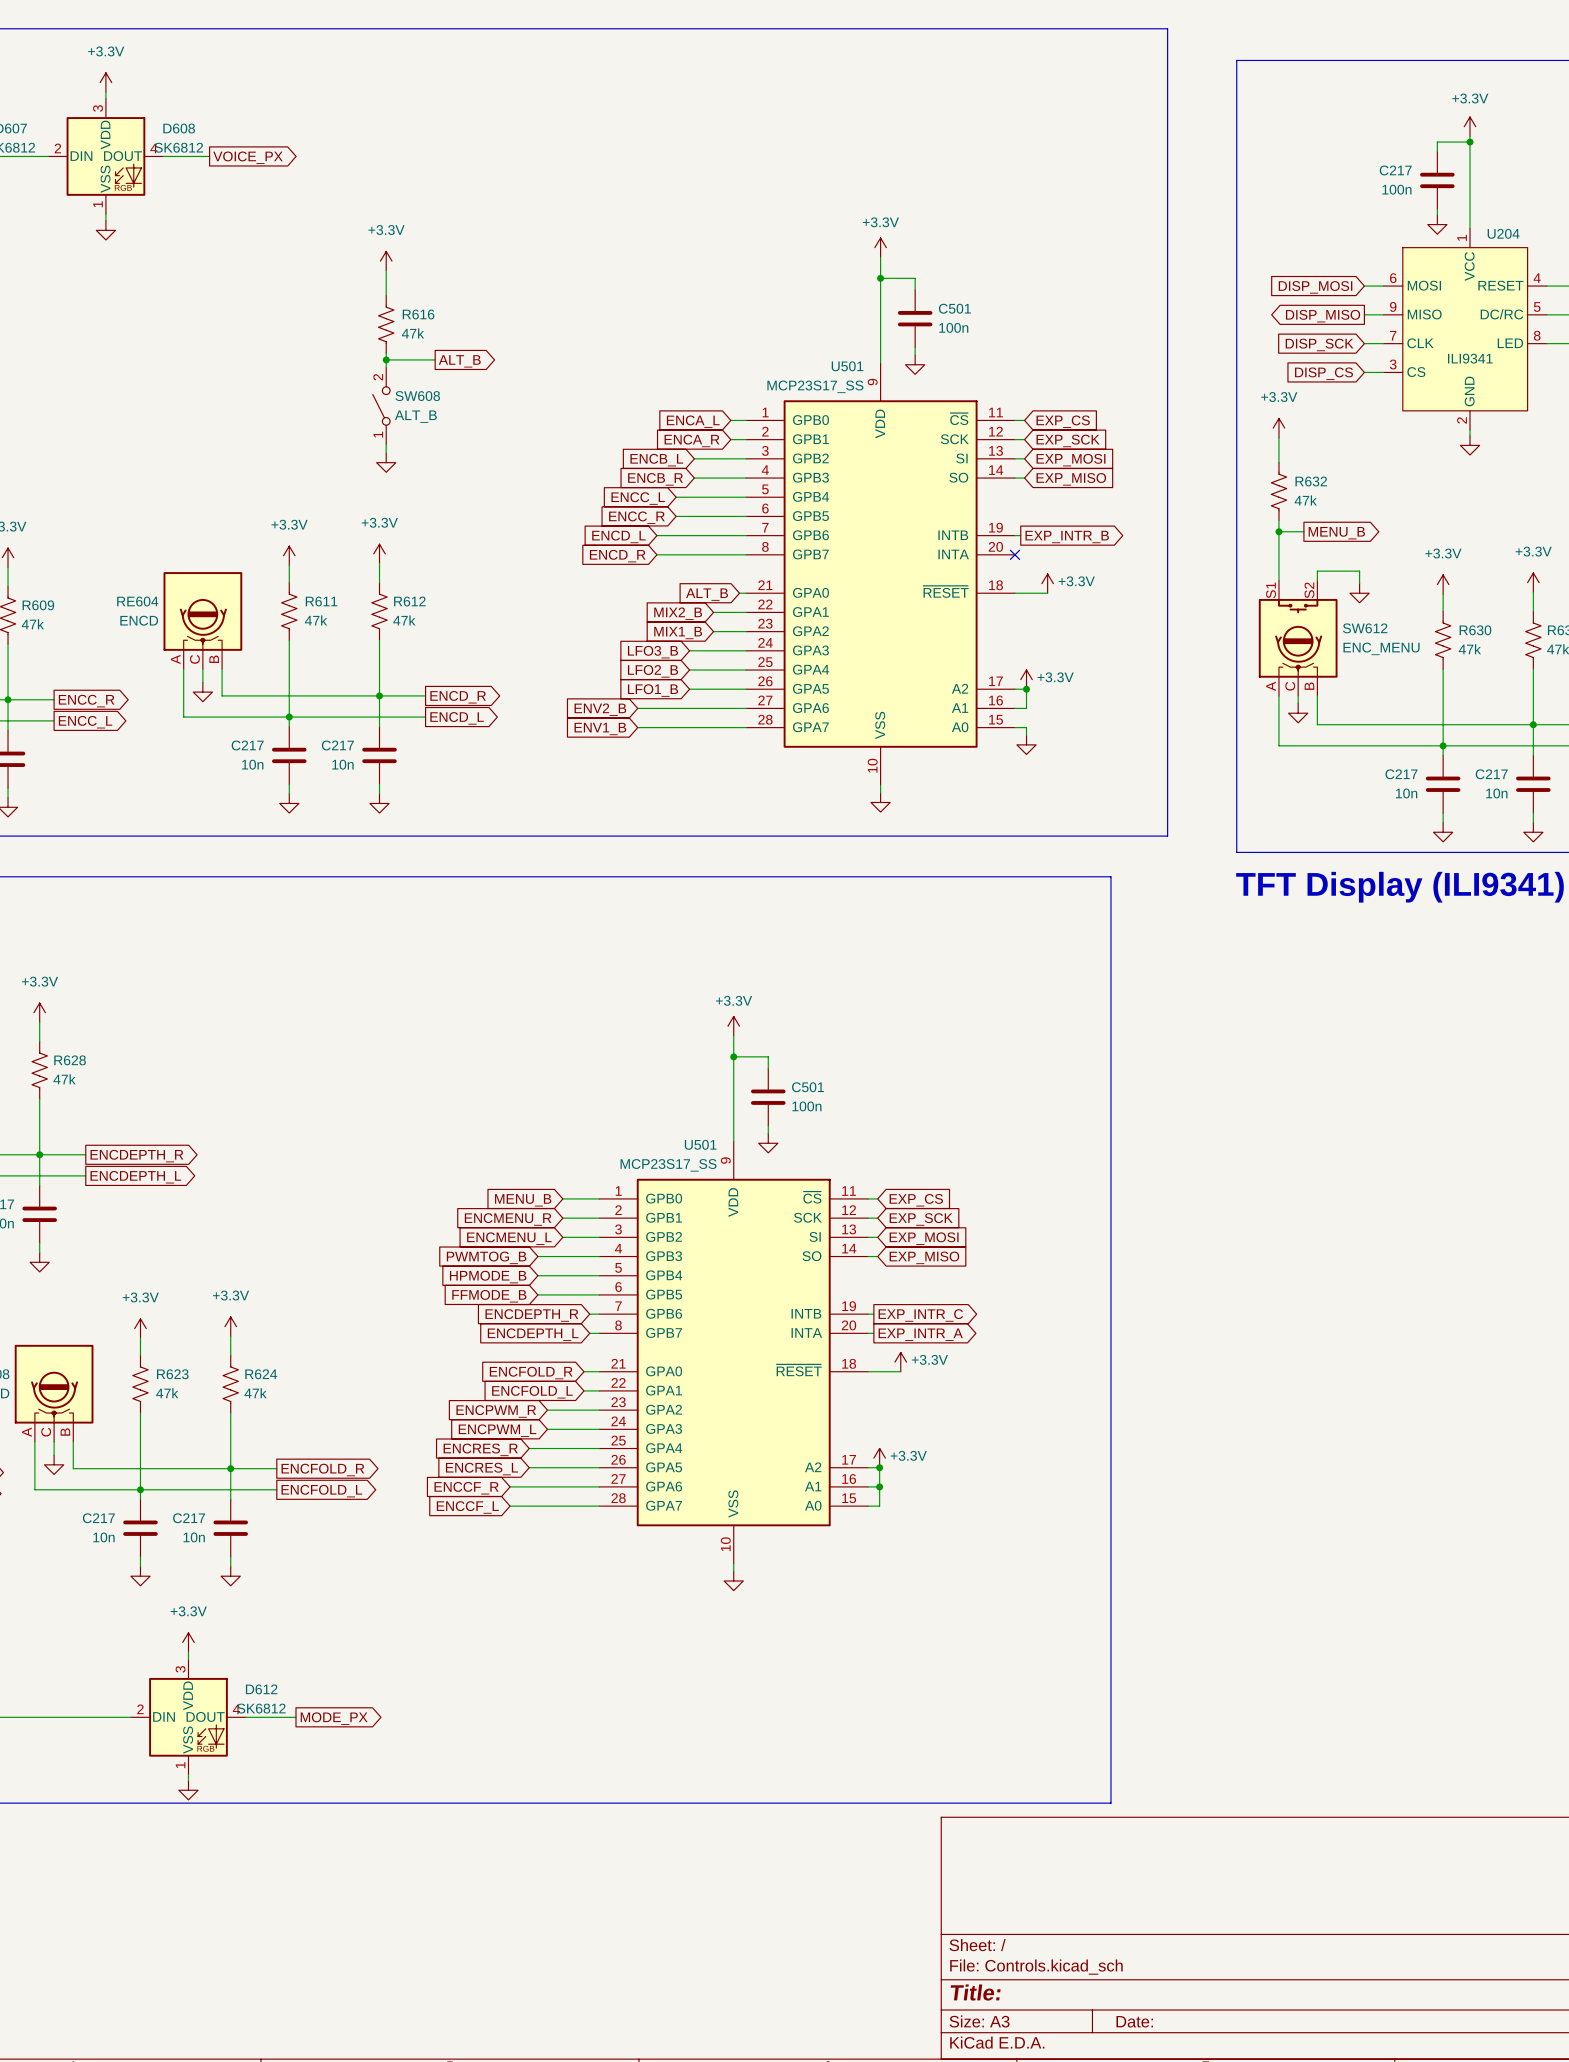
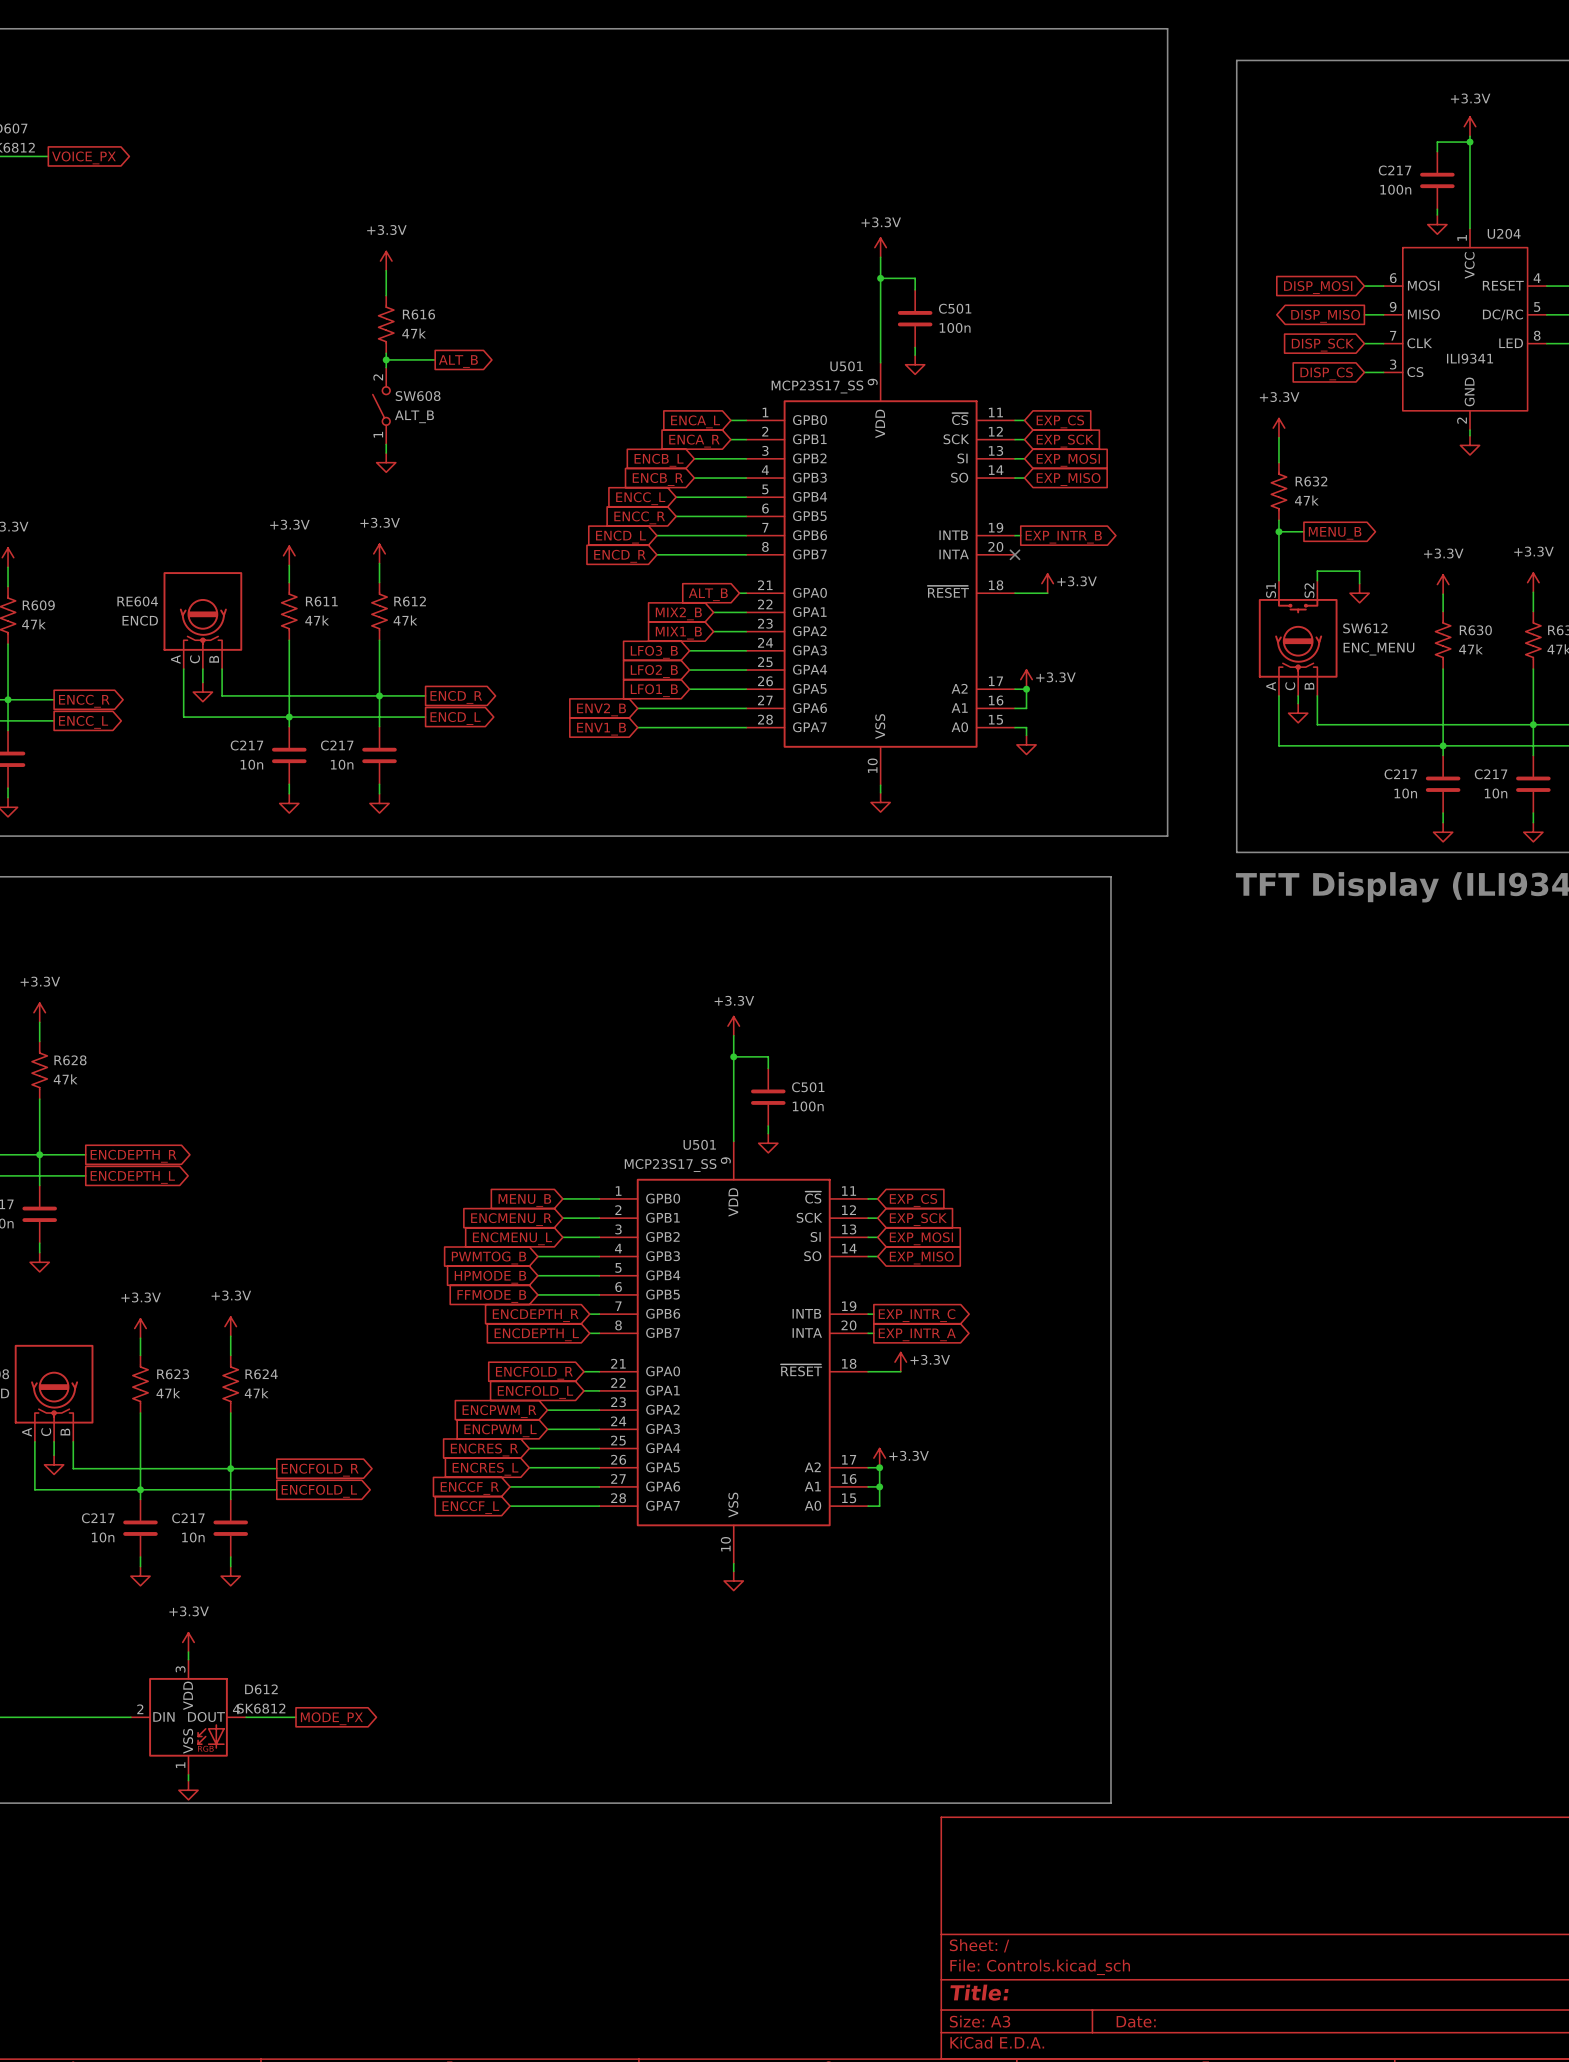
power symbol: +3.3V (105, 82) -> none
wire: (105, 92) (105, 98) -> none
D608: SK6812 (105, 156) -> none
wire: (163, 156) (209, 156) -> none
global label position: VOICE_PX (247, 157) -> VOICE_PX (83, 157)
wire: (105, 214) (105, 220) -> none
power symbol: (105, 230) -> none

